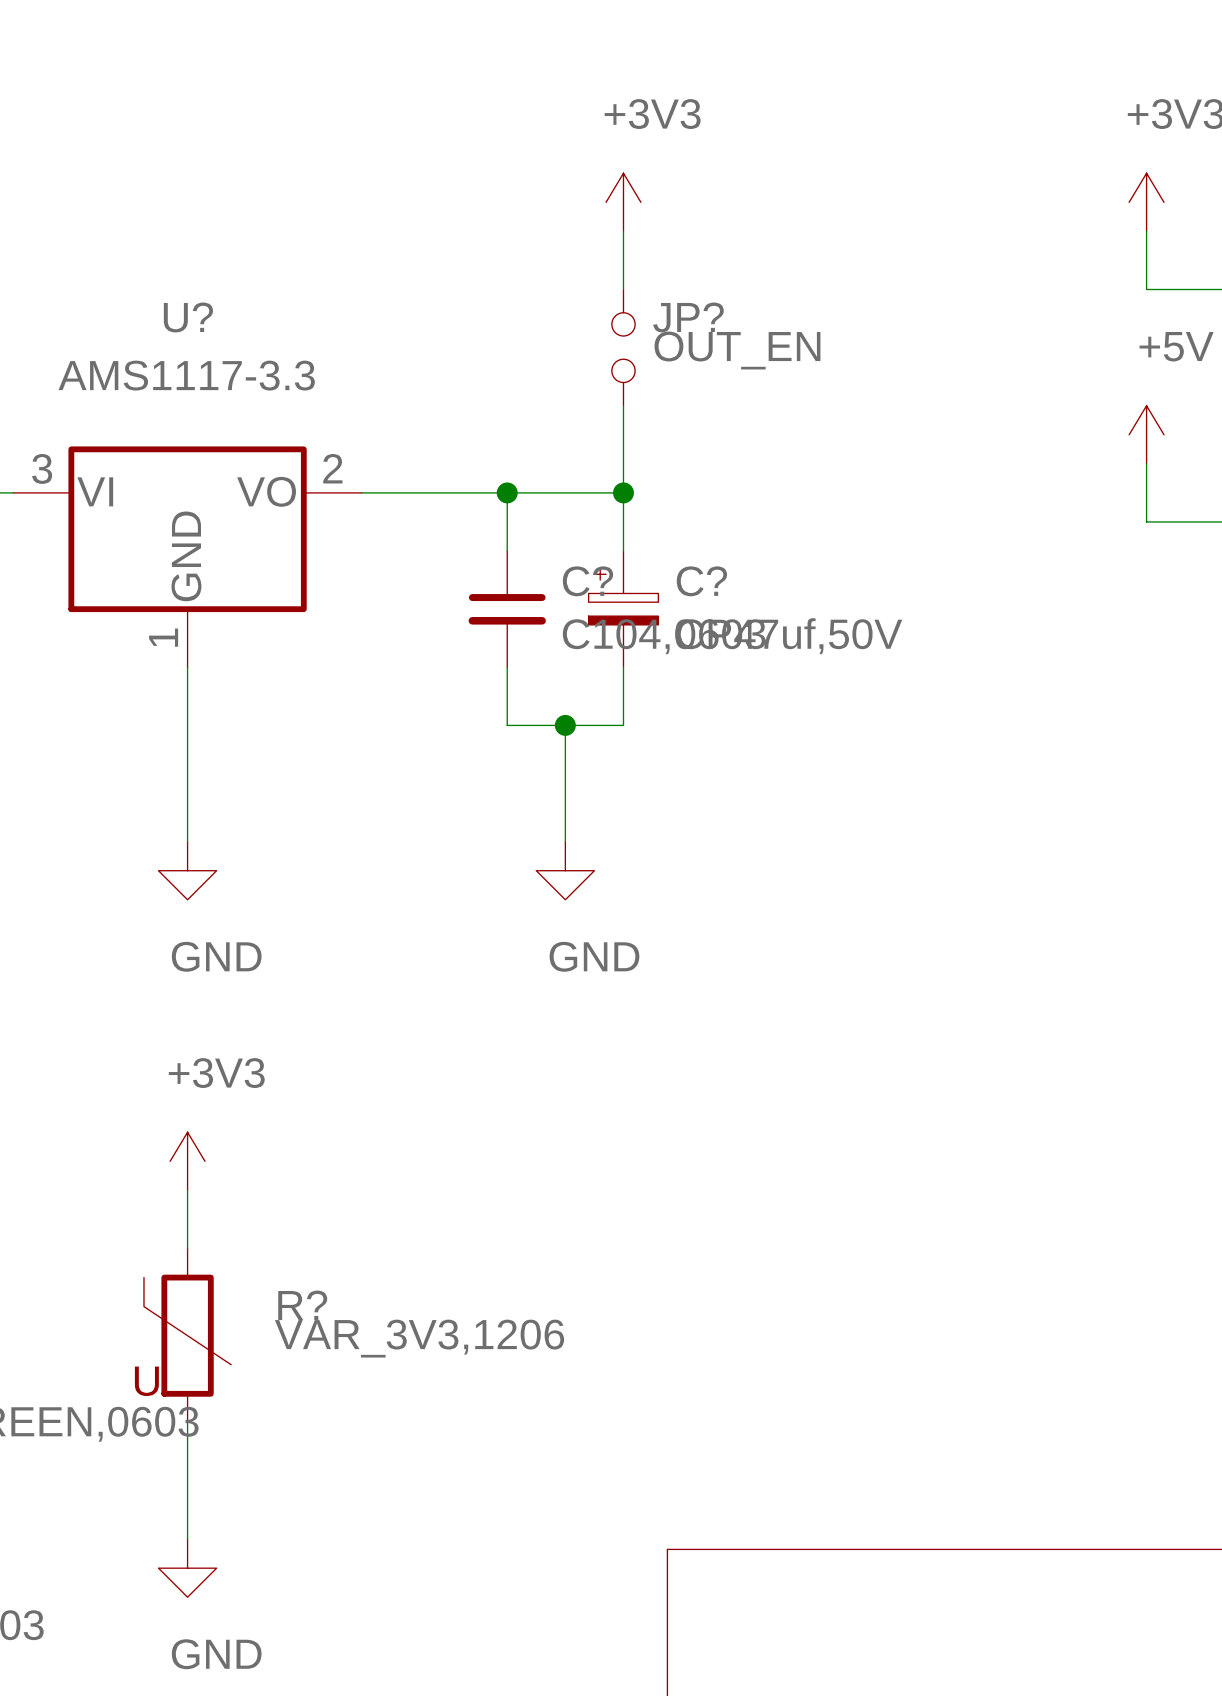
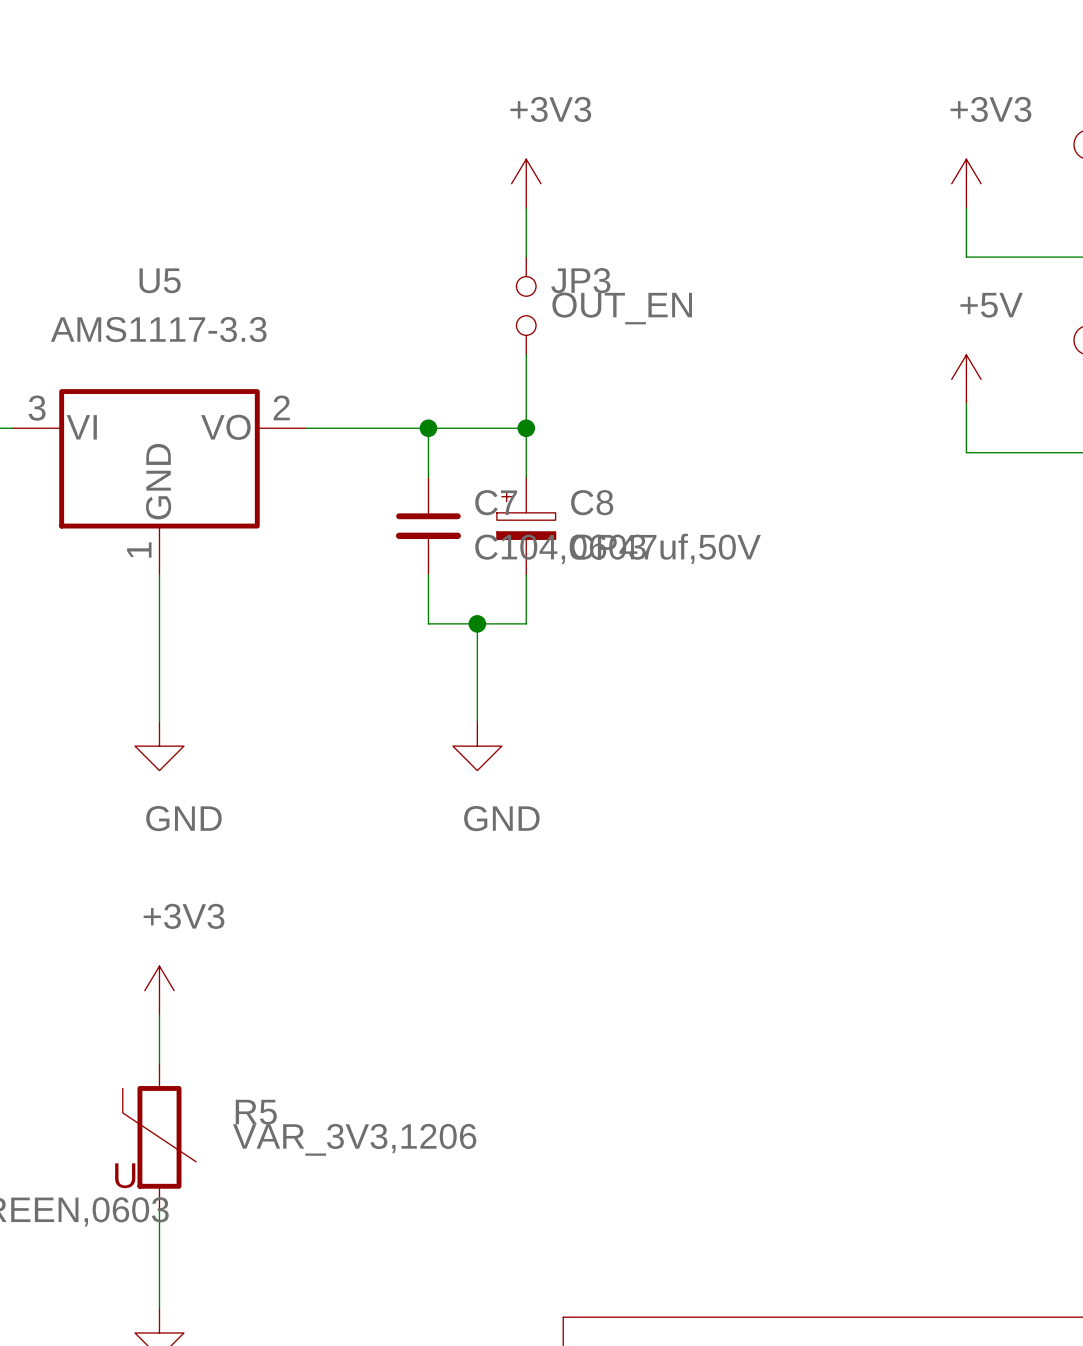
U? name: U? (188, 317) -> U5 (160, 280)
JP? name: JP? (688, 317) -> JP3 (580, 280)
C? name: C? (588, 581) -> C7 (496, 502)
C? name: C? (701, 581) -> C8 (592, 502)
R? name: R? (302, 1305) -> R5 (256, 1112)

